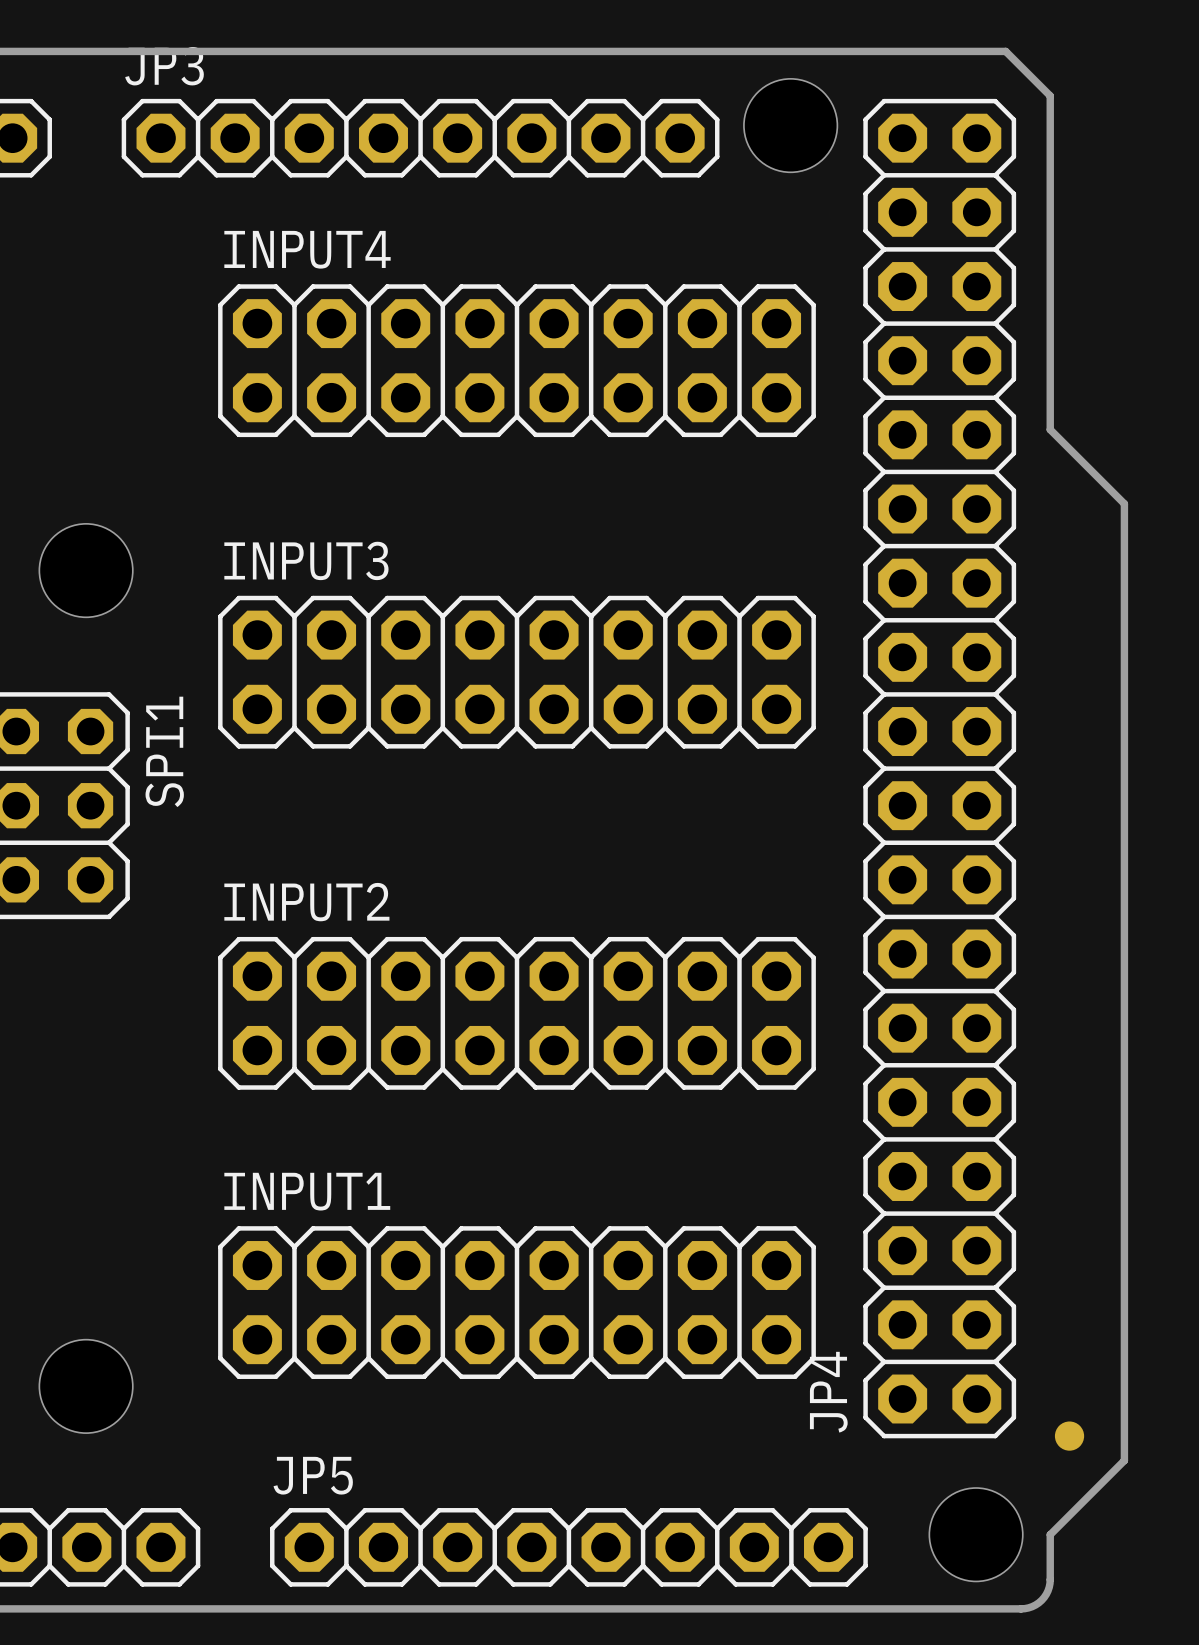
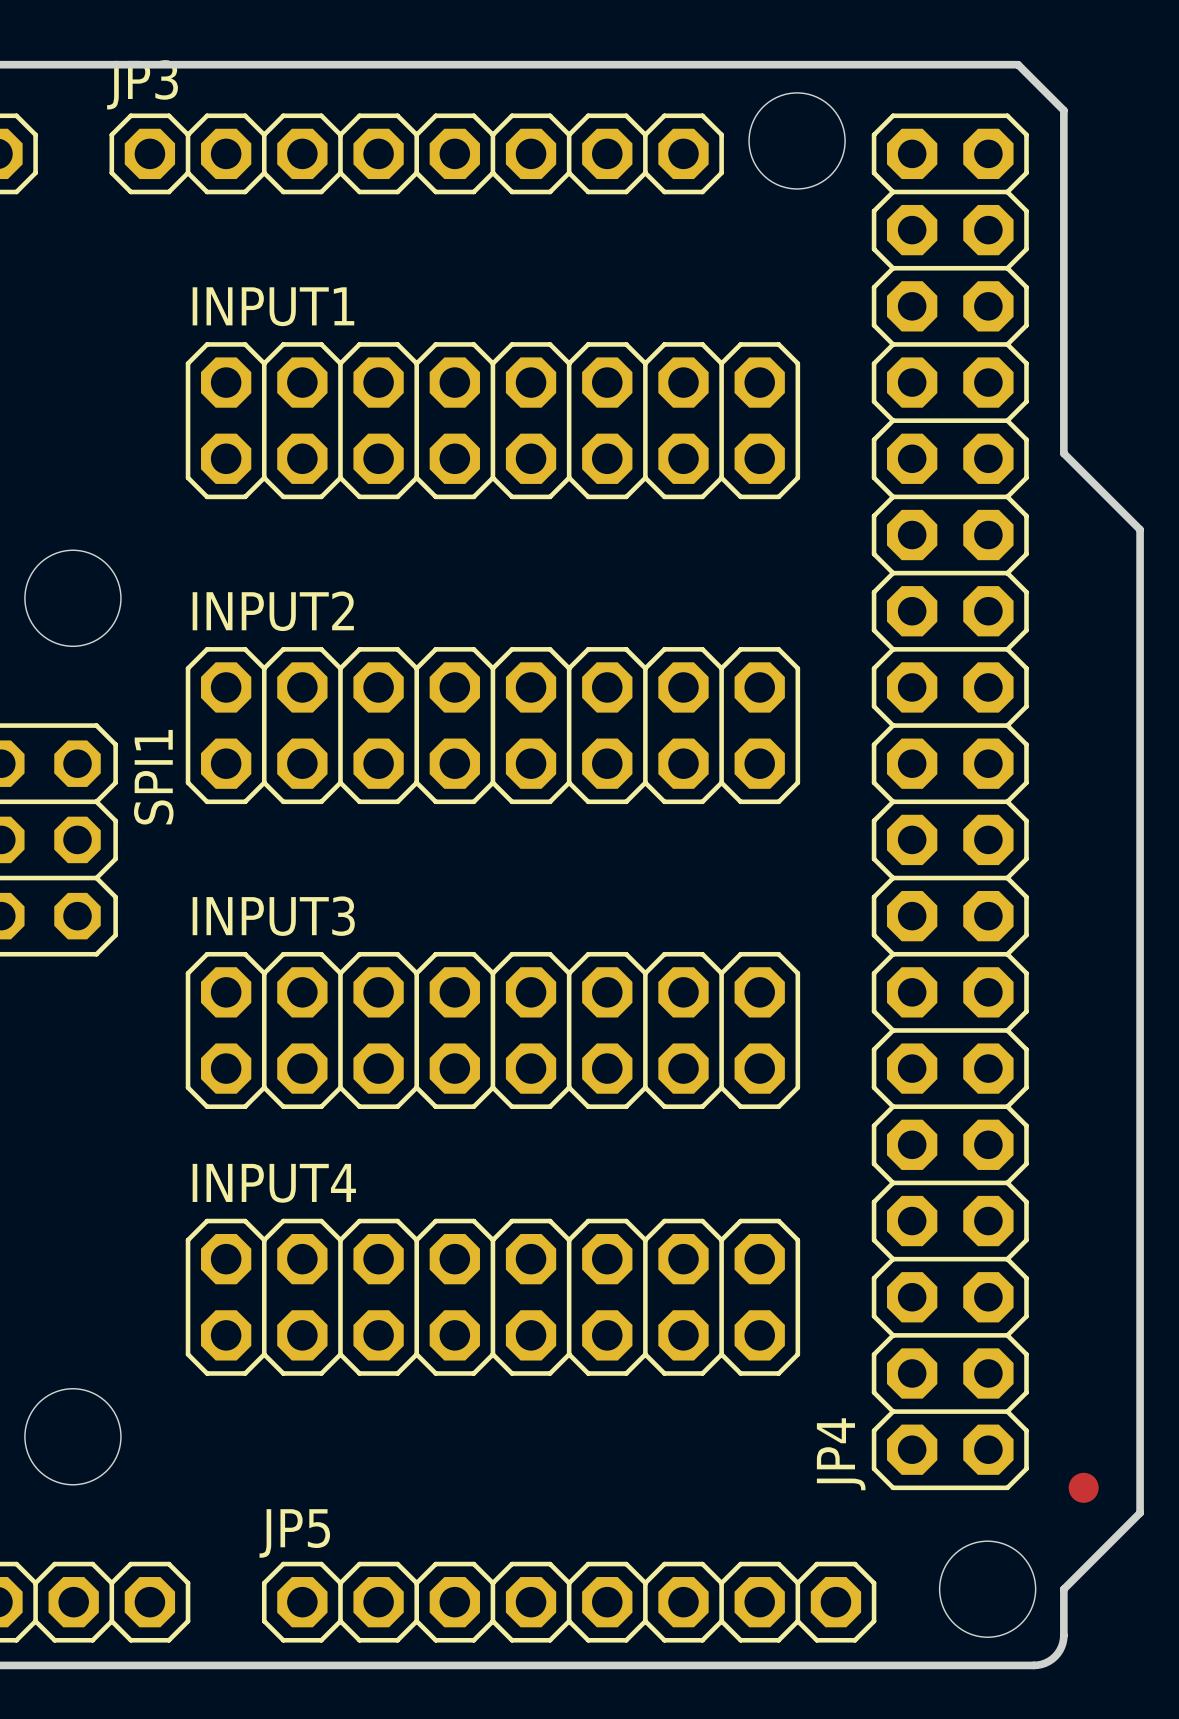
INPUT4 position: (516, 360) -> (492, 1297)
INPUT3 position: (516, 672) -> (492, 1030)
INPUT2 position: (516, 1013) -> (492, 725)
INPUT1 position: (516, 1302) -> (492, 420)

